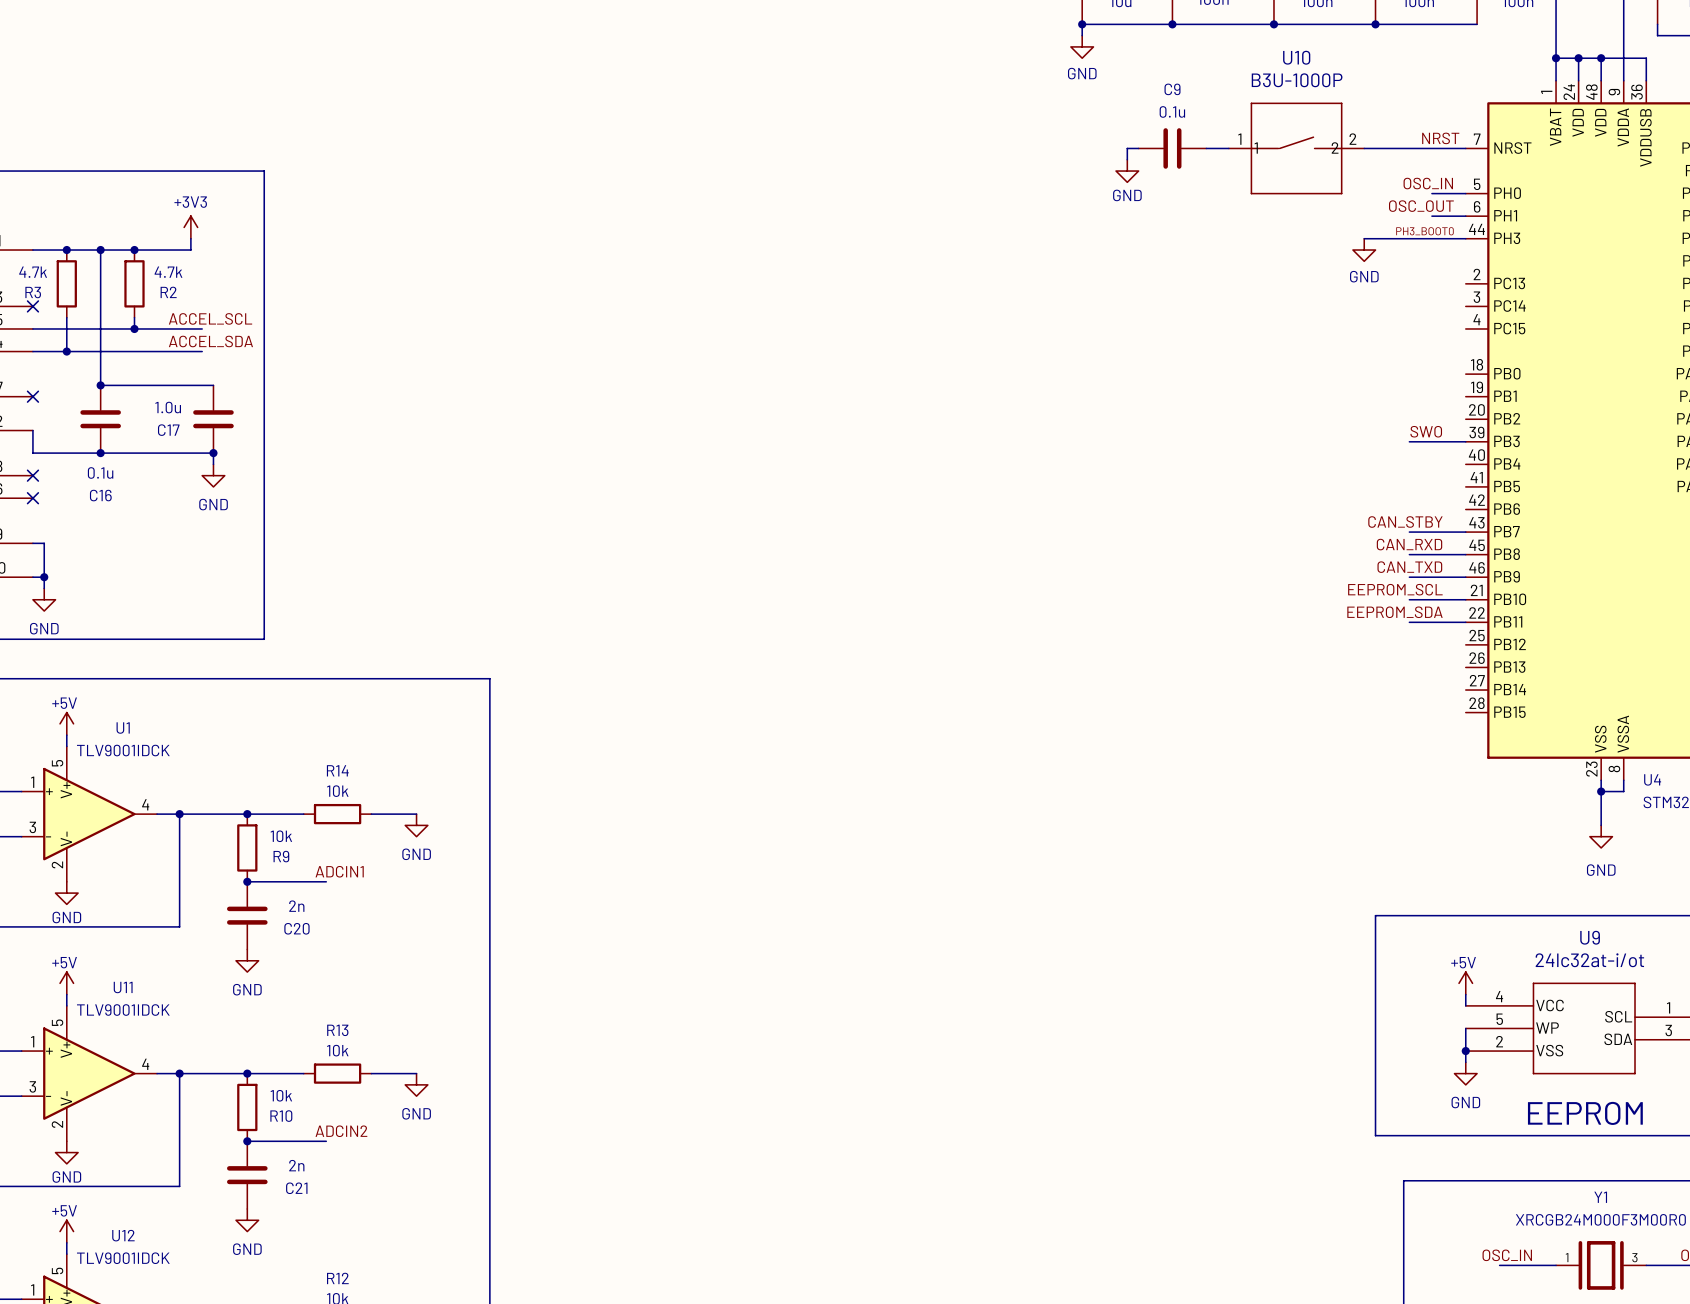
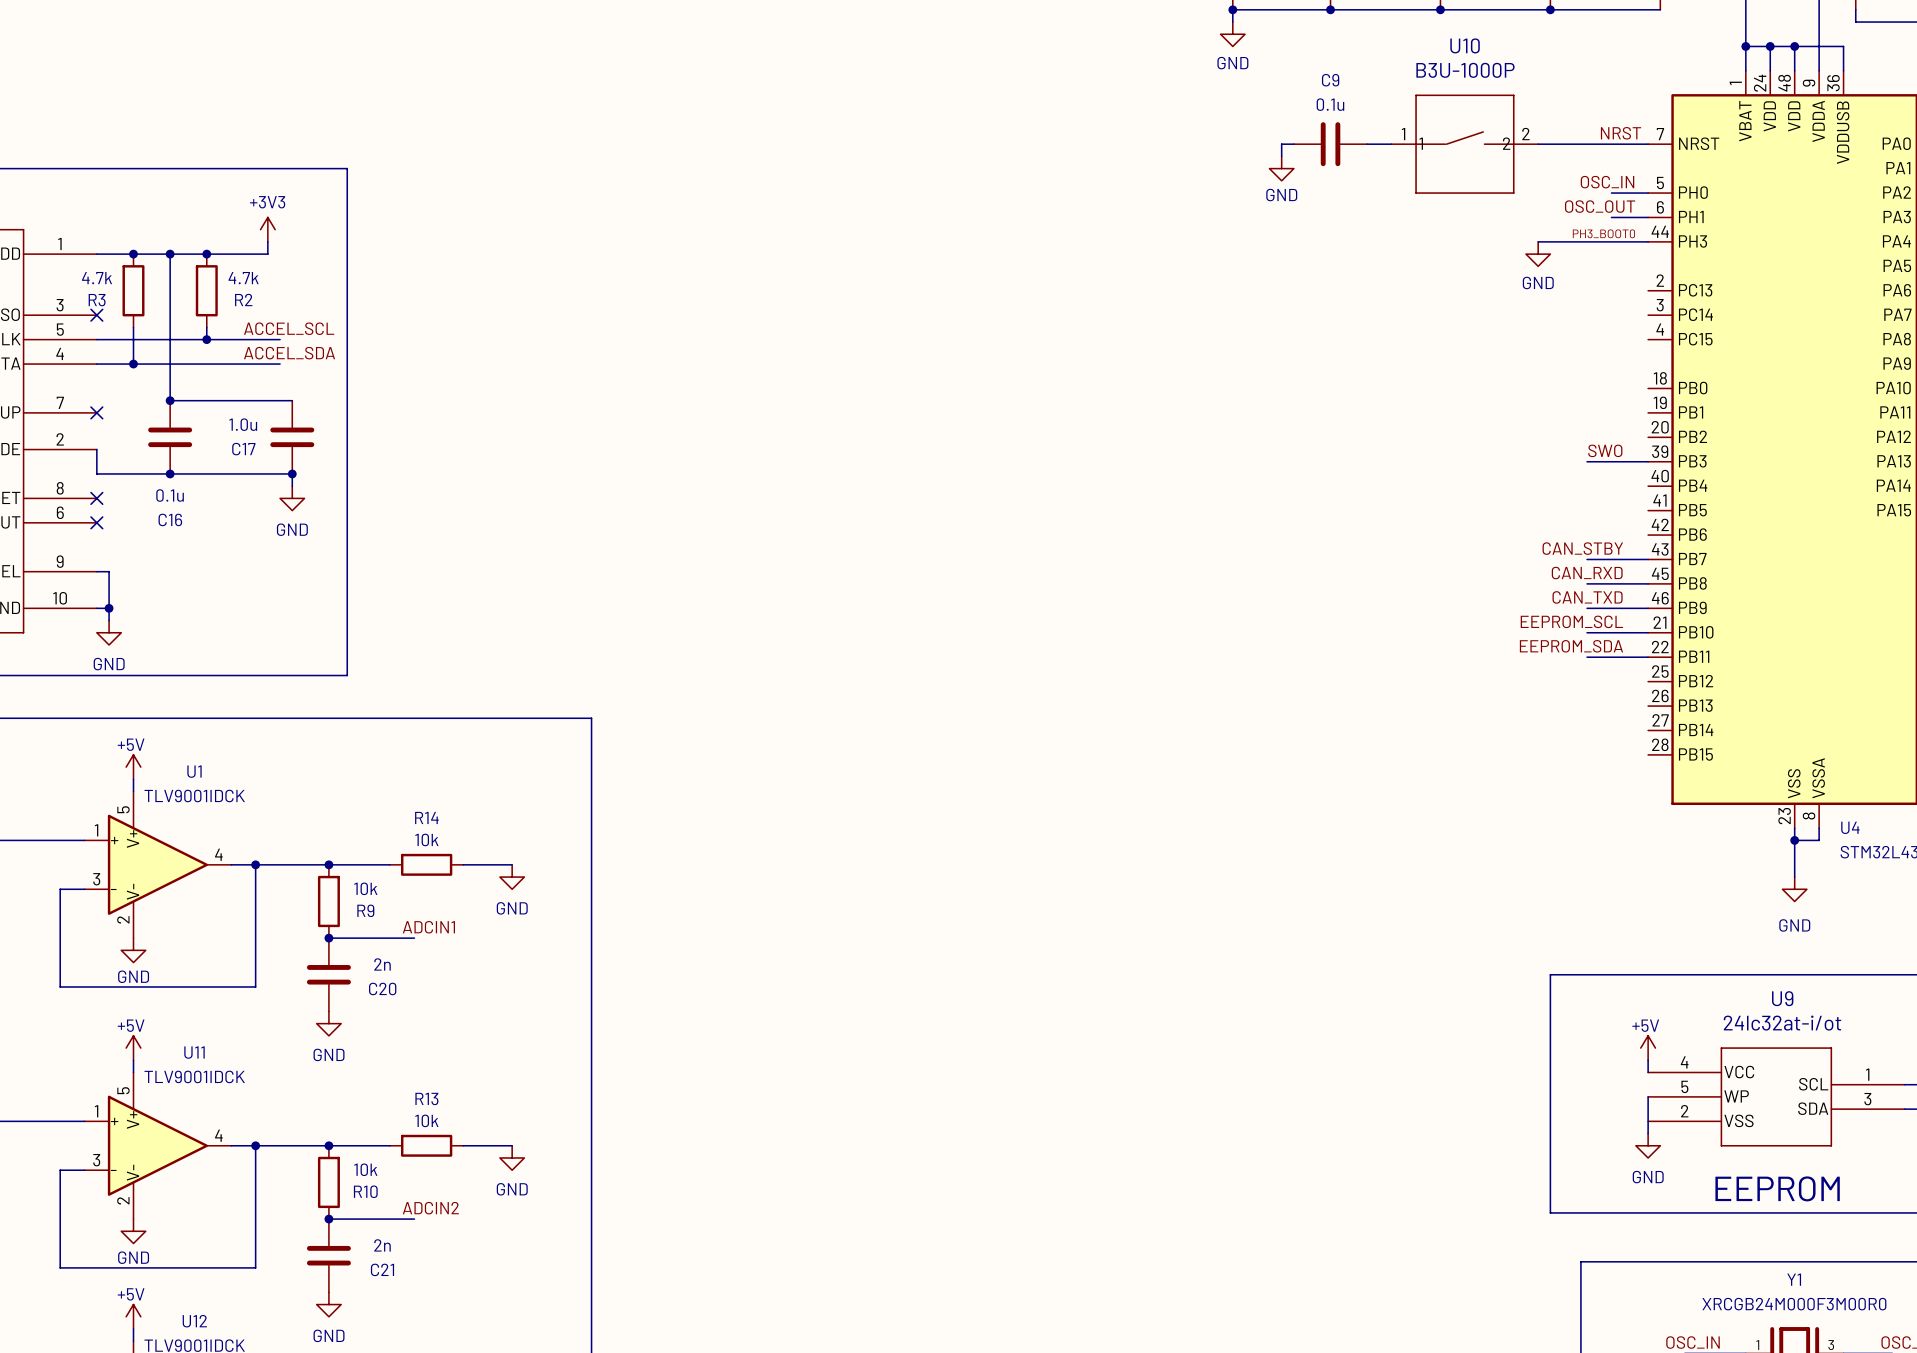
junction: (1465, 1051) -> none

